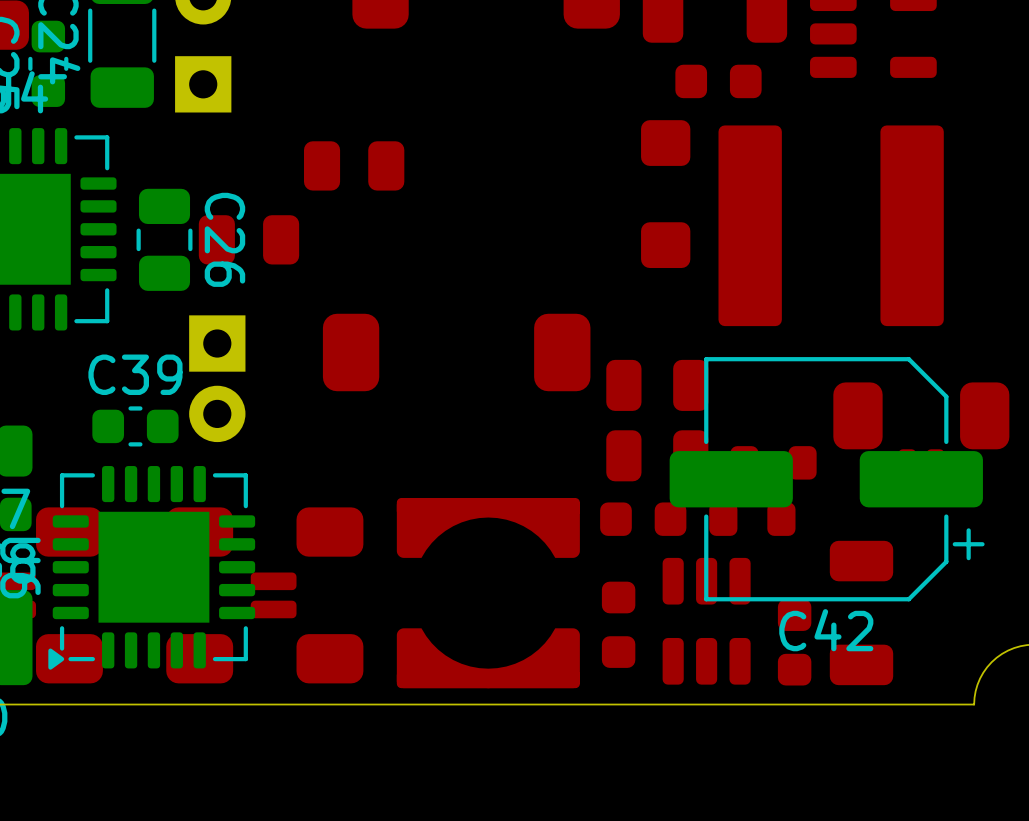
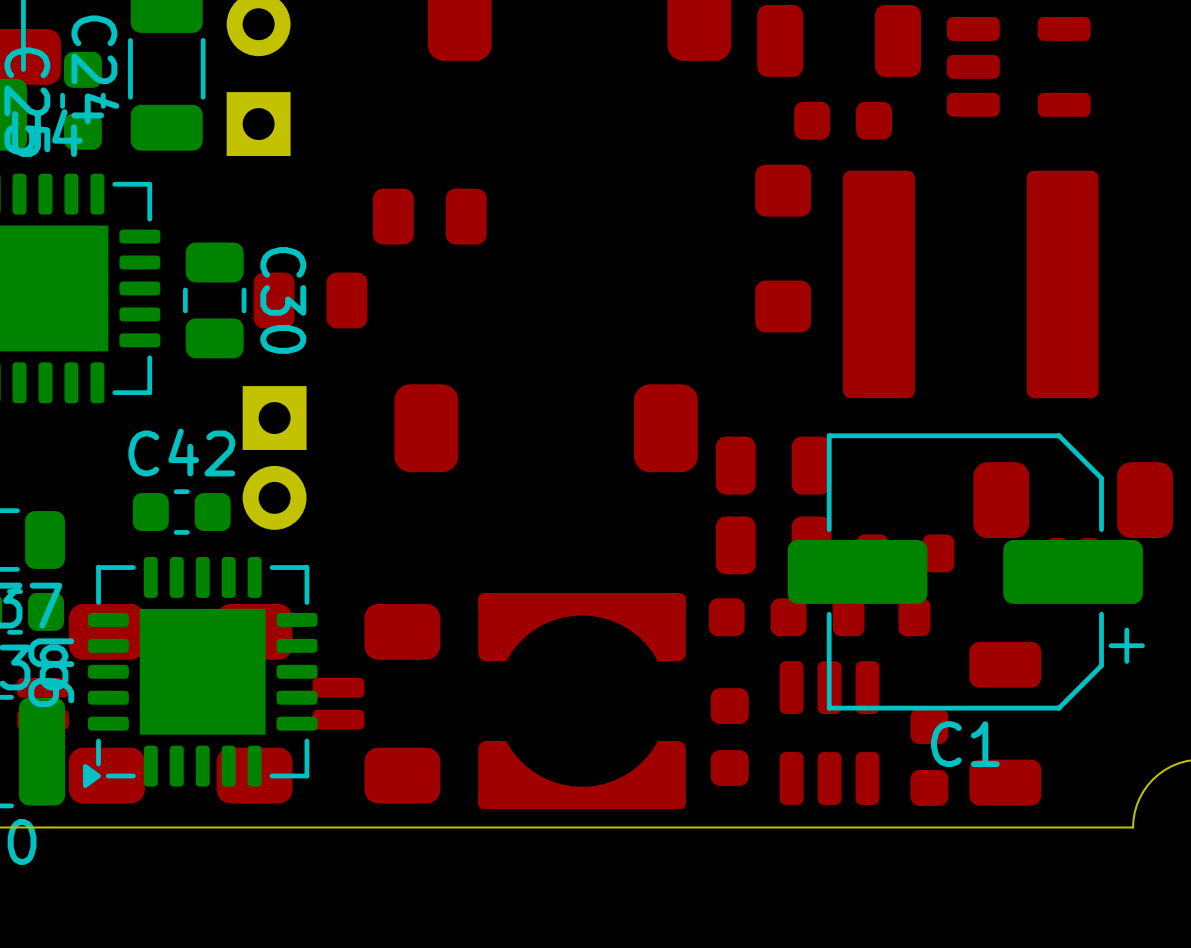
C26 name: C26 (224, 239) -> C30 (283, 300)
C39 name: C39 (135, 374) -> C42 (181, 452)
C42 name: C42 (826, 630) -> C1 (965, 744)

